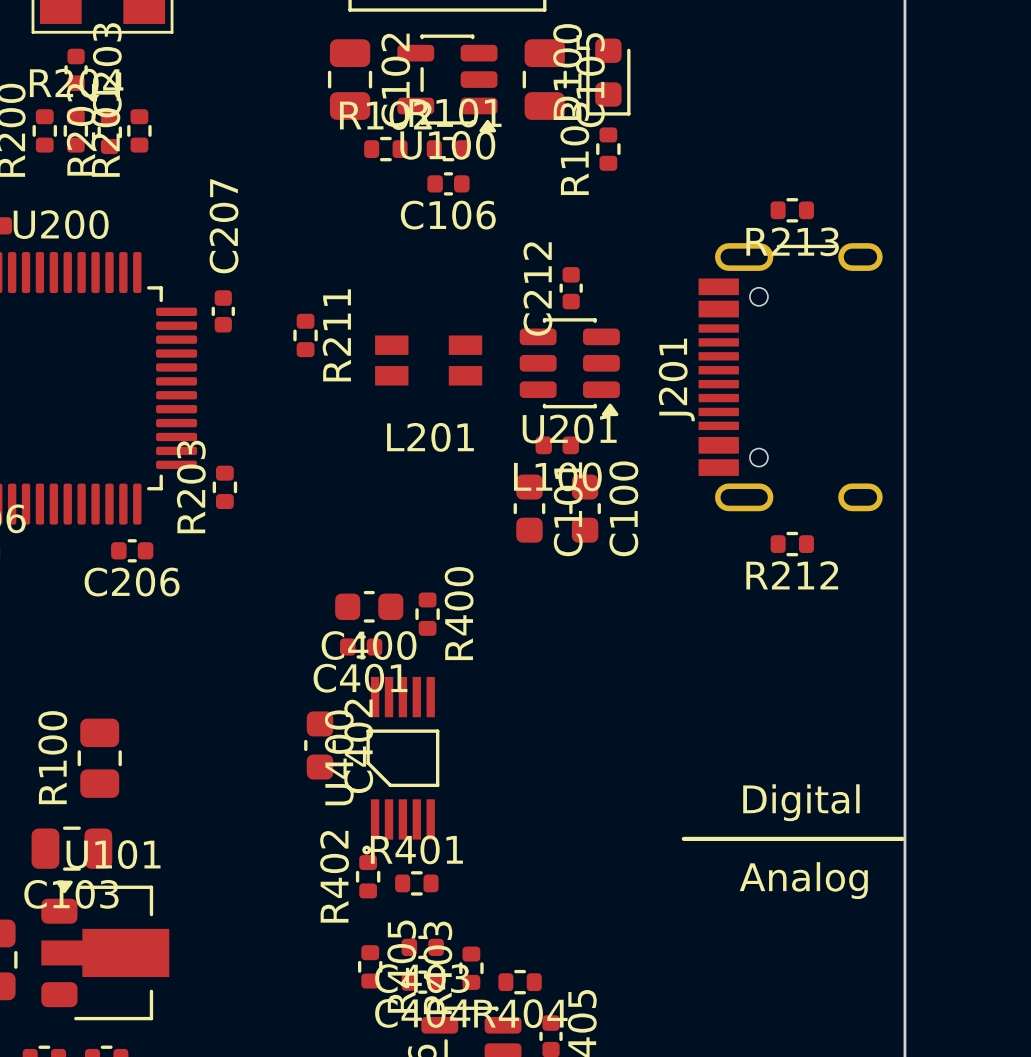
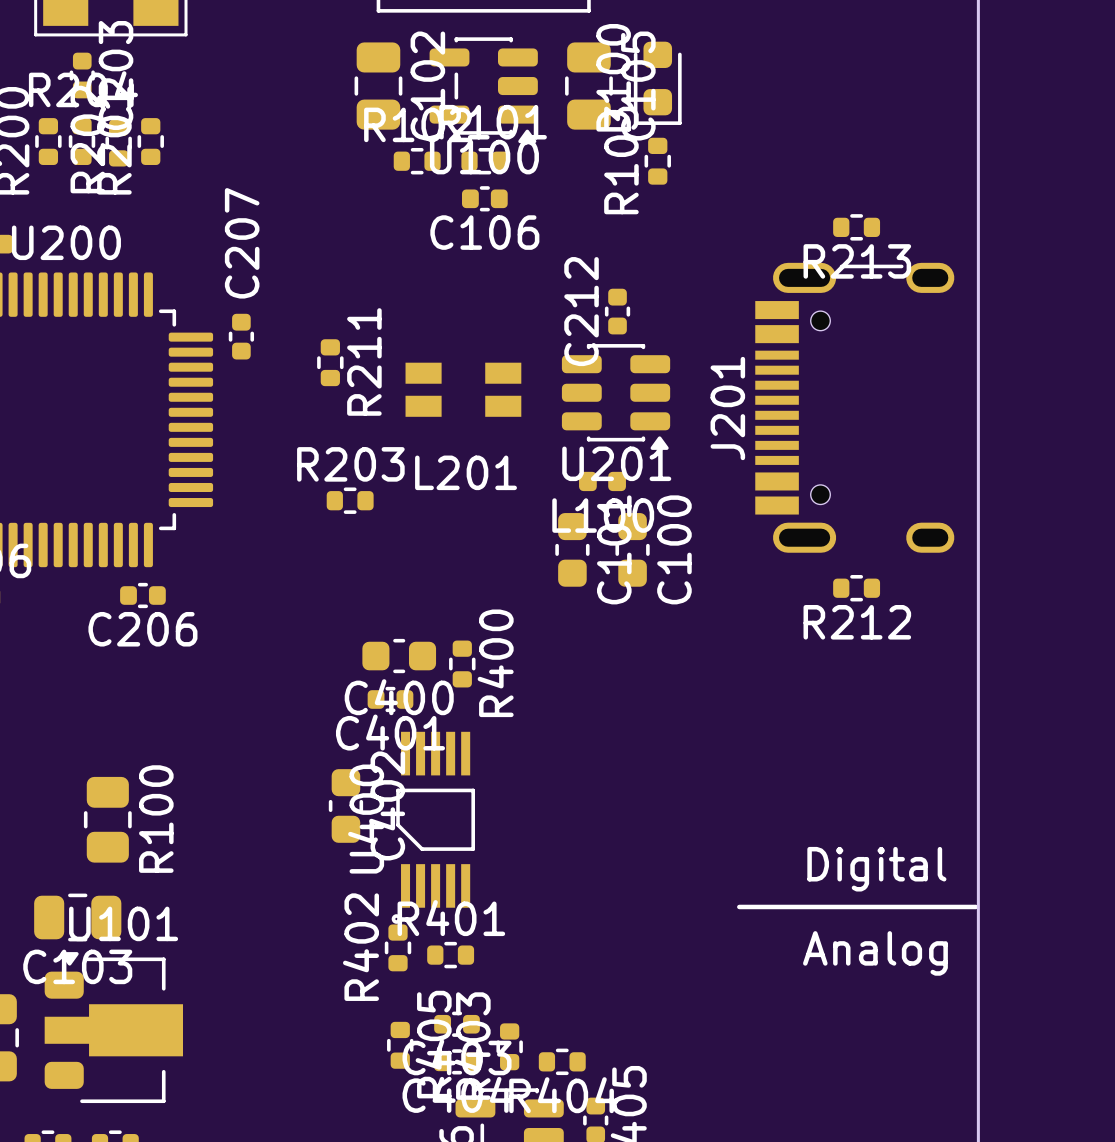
R203 rotation: 0° (224, 487) -> 90° clockwise (350, 500)
R203 position: (224, 487) -> (350, 500)
R100 name position: R100 (52, 757) -> R100 (156, 819)

